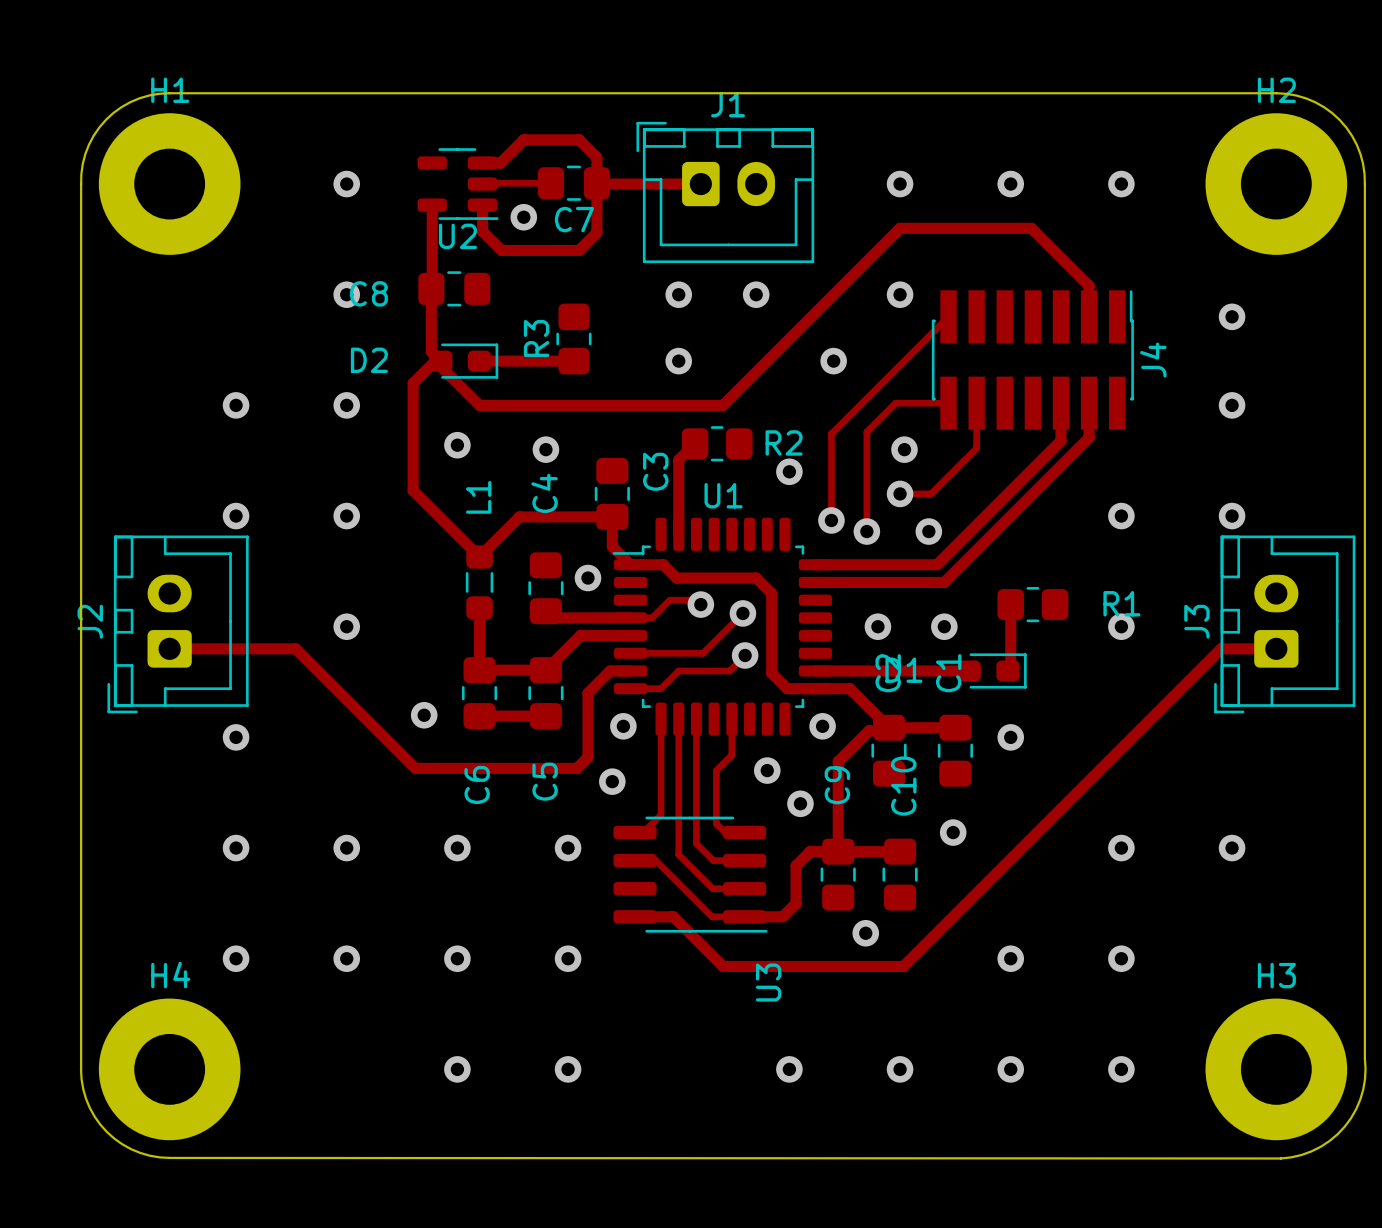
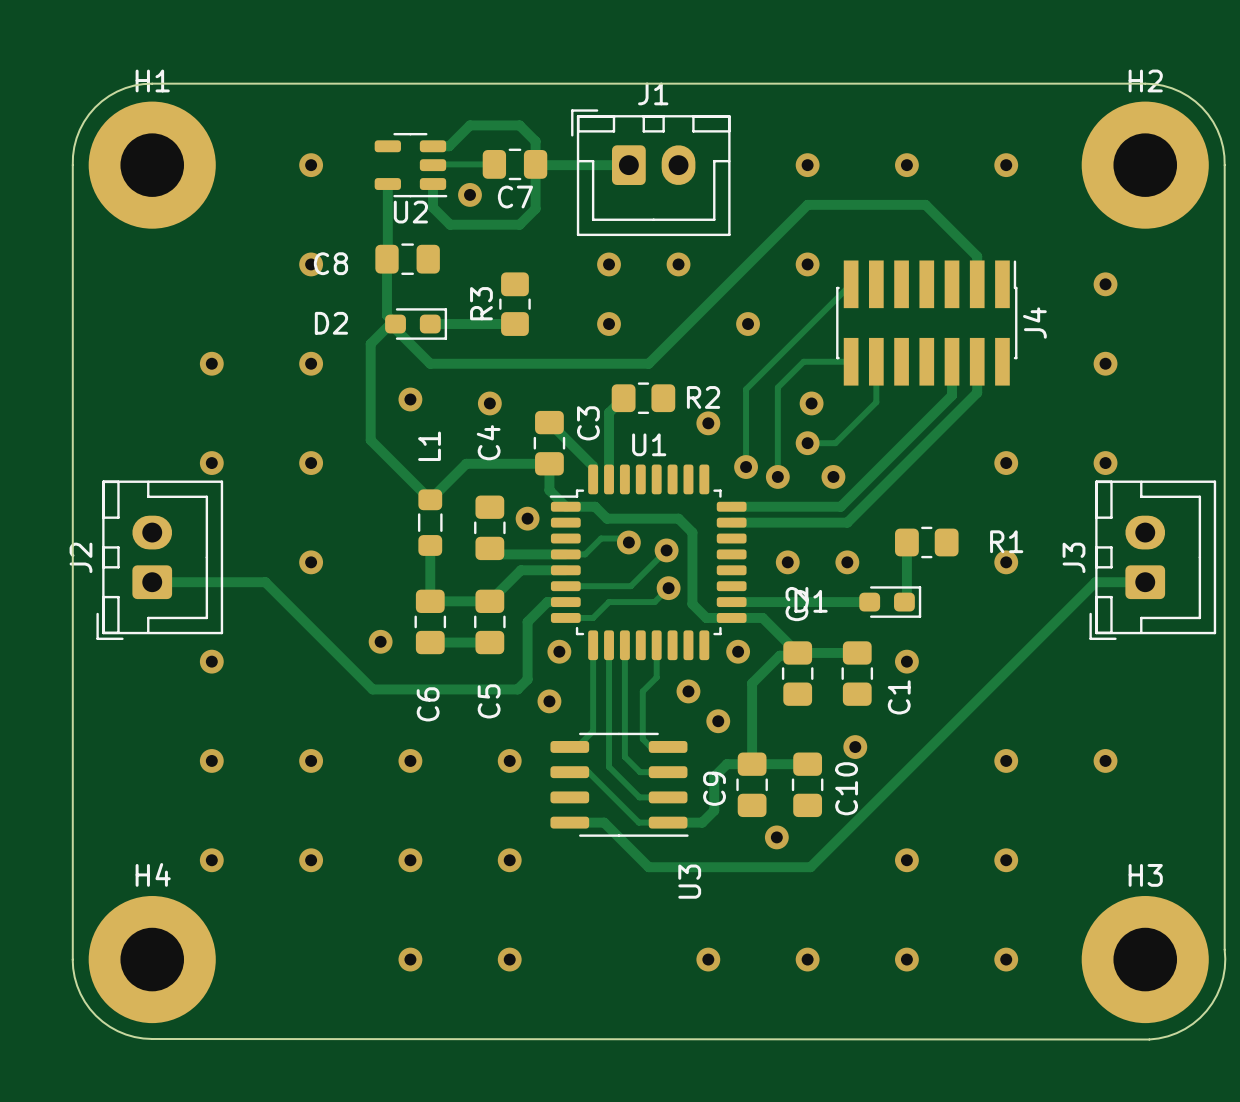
track: none -> (549, 422) (593, 466) (593, 479)
C1 name position: C1 (948, 673) -> C1 (899, 697)
C9 name position: C9 (837, 785) -> C9 (714, 788)
C10 name position: C10 (903, 786) -> C10 (846, 788)

